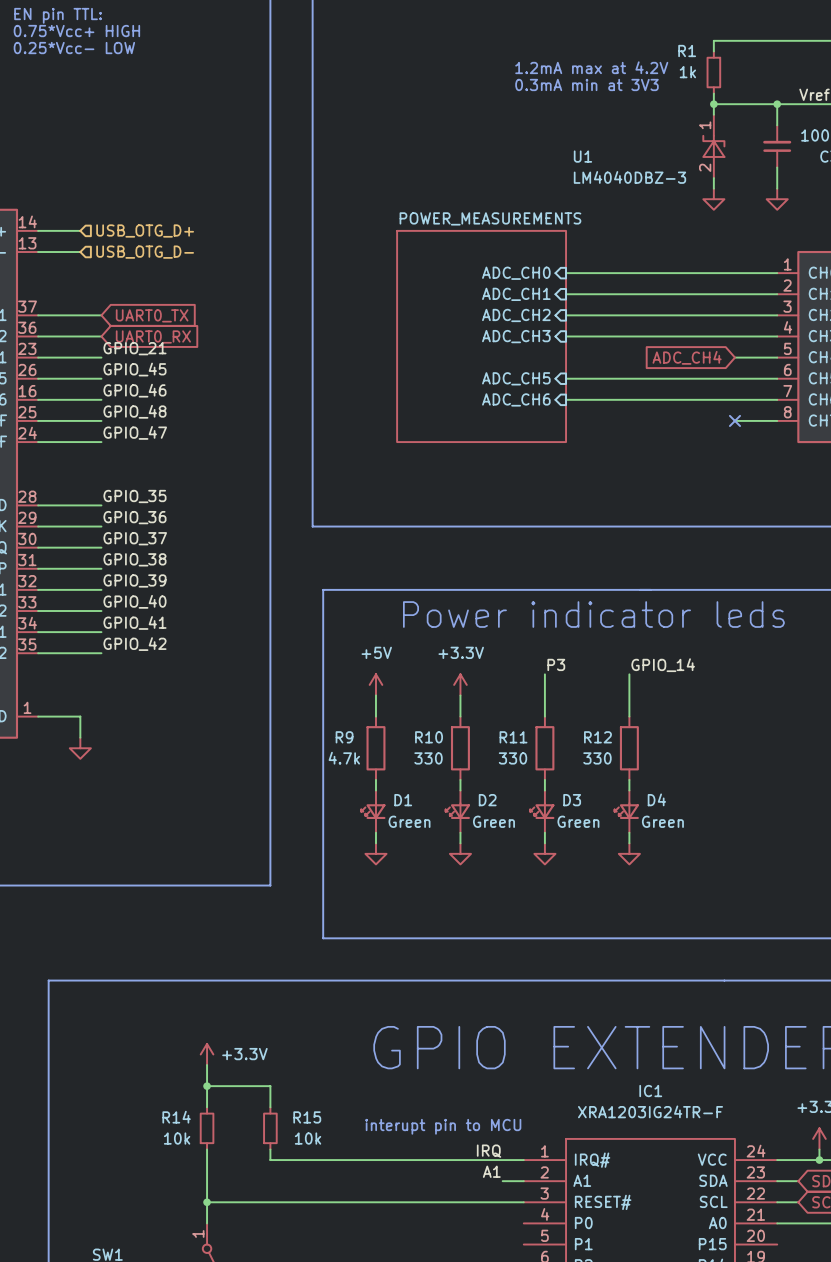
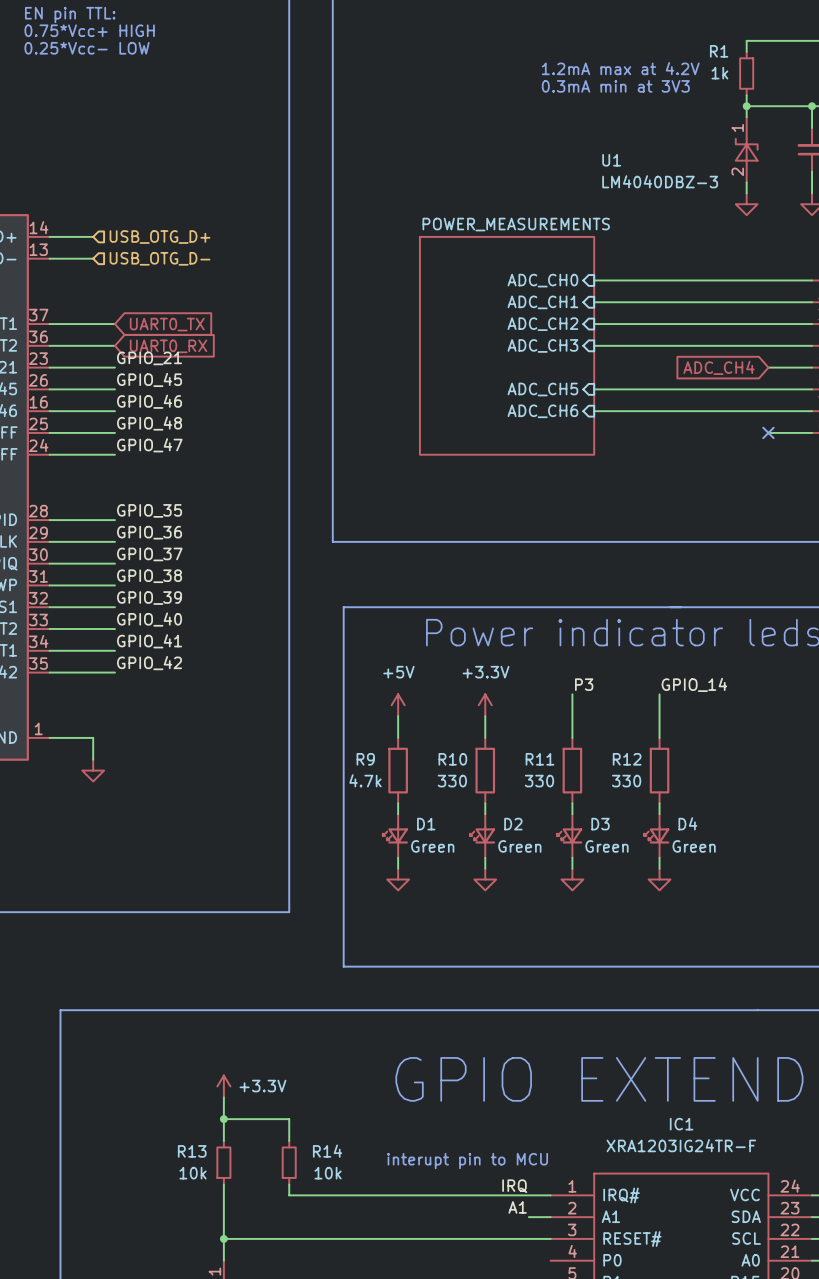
R14 name: R14 (176, 1117) -> R13 (192, 1151)
R15 name: R15 (307, 1117) -> R14 (327, 1151)

